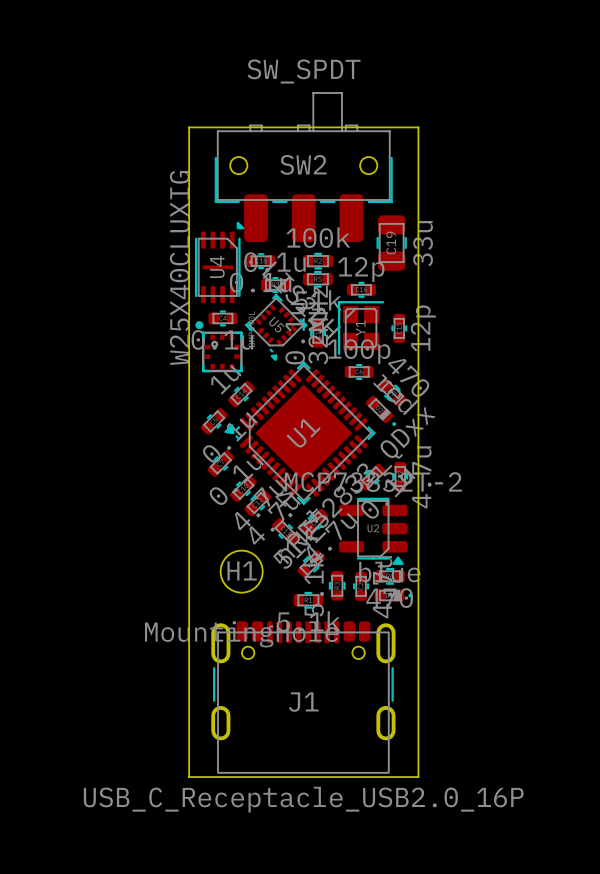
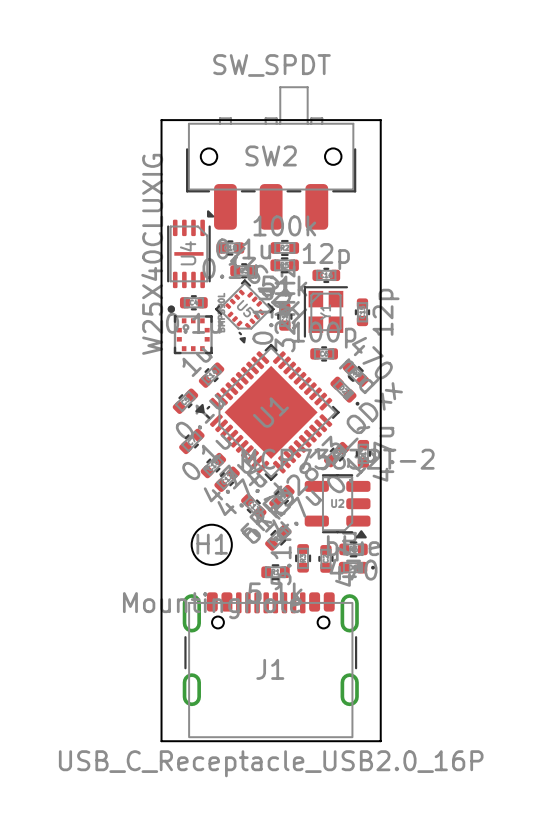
C19: 33u (391, 242) -> none

